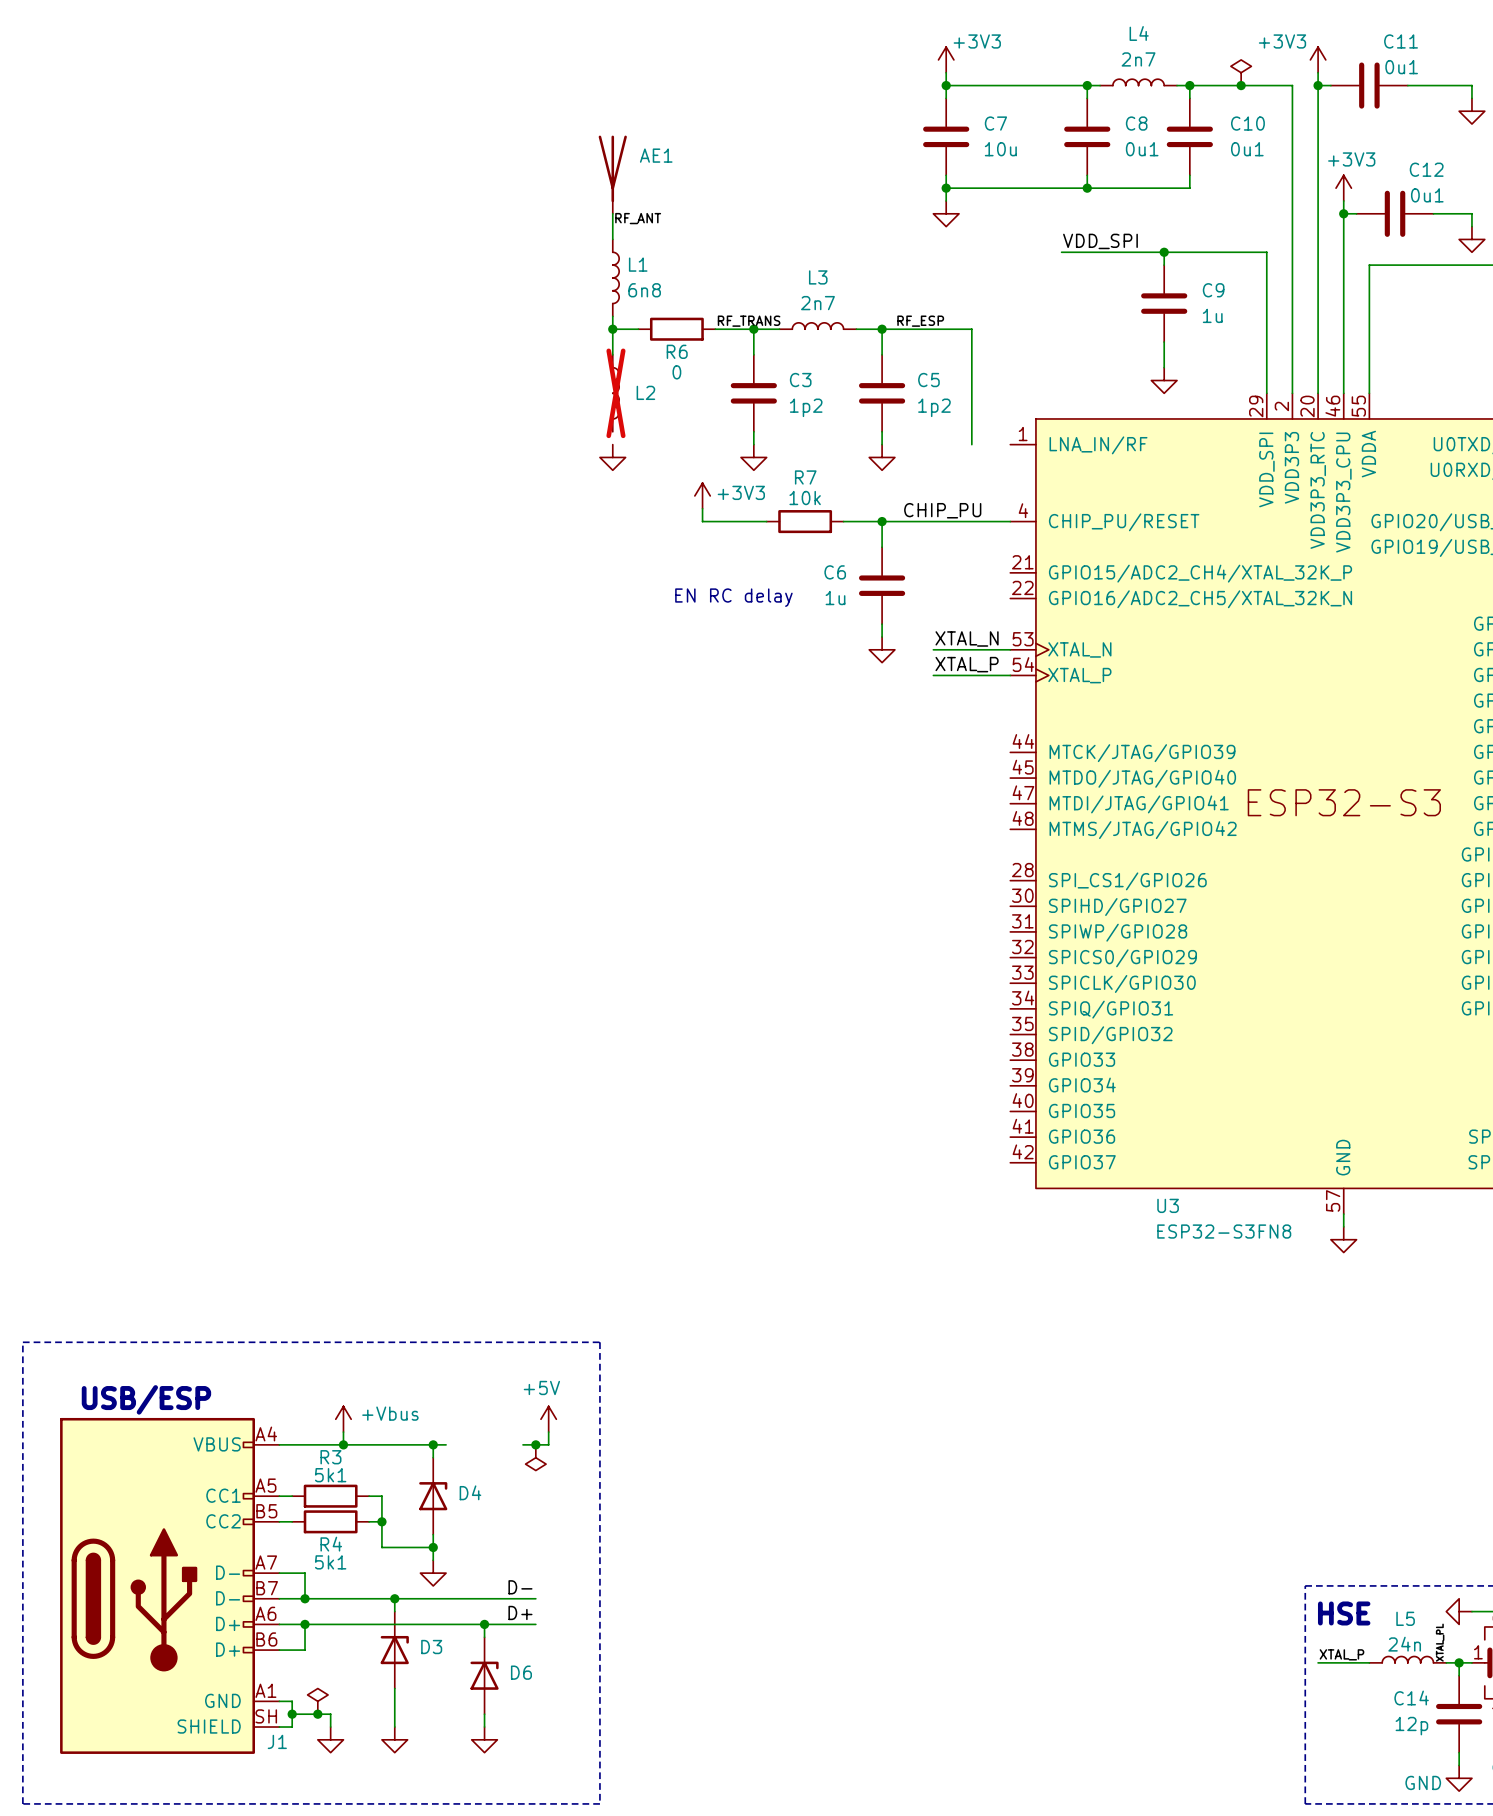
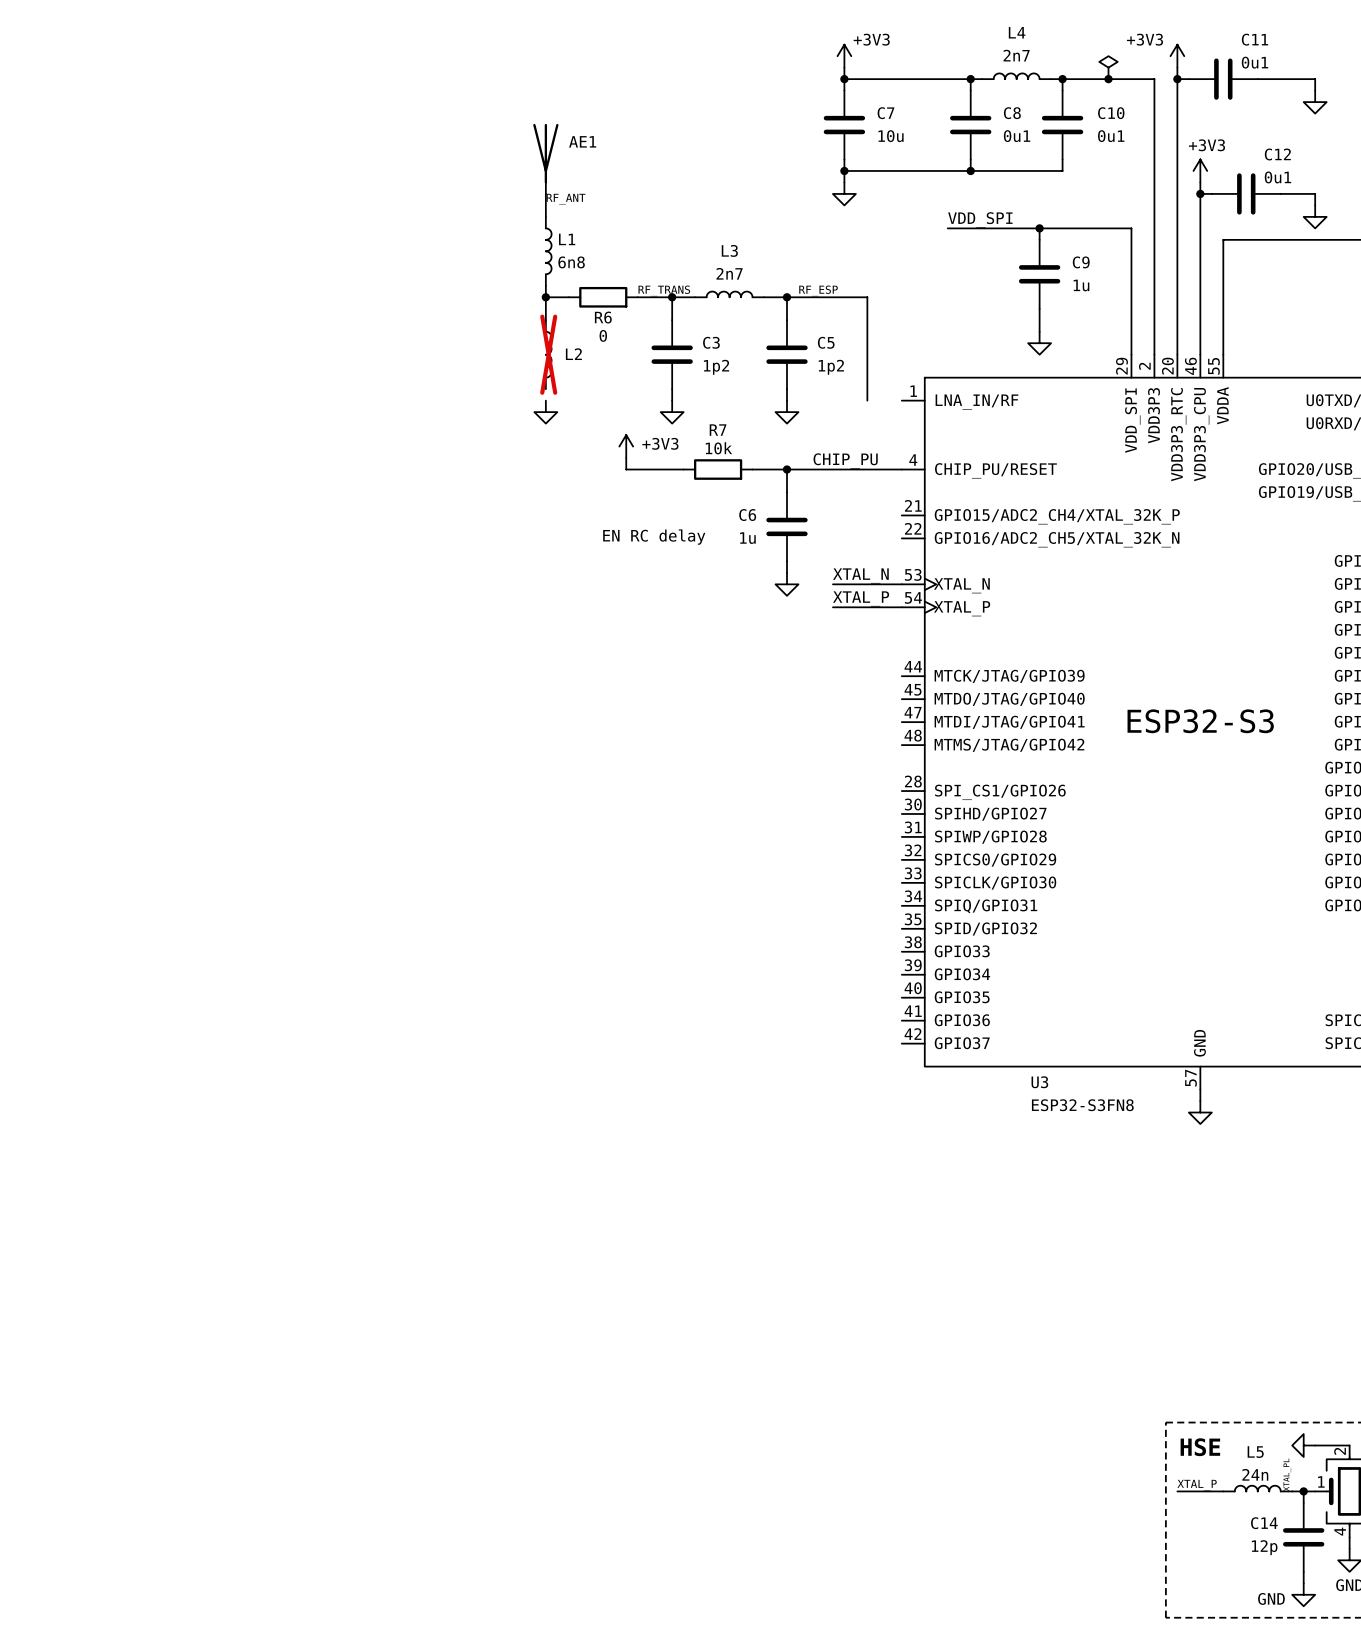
line: (22, 1342) (599, 1342) (599, 1803) (22, 1803) (22, 1342) -> none
text: USB/ESP (146, 1399) -> none
power symbol: +Vbus (343, 1419) -> none
power symbol: +5V (548, 1419) -> none
wire: (343, 1432) (343, 1444) -> none
wire: (548, 1432) (548, 1444) (523, 1444) -> none
wire: (279, 1444) (446, 1444) -> none
junction: (343, 1444) -> none
wire: (433, 1444) (433, 1457) -> none
junction: (433, 1444) -> none
junction: (535, 1444) -> none
power symbol: (535, 1457) -> none
wire: (279, 1496) (292, 1496) -> none
R3: 5k1 (330, 1496) -> none
wire: (369, 1496) (381, 1496) (381, 1547) (433, 1547) -> none
D4: (433, 1496) -> none
wire: (279, 1521) (292, 1521) -> none
R4: 5k1 (330, 1521) -> none
wire: (369, 1521) (381, 1521) -> none
junction: (381, 1521) -> none
wire: (433, 1534) (433, 1560) -> none
junction: (433, 1547) -> none
wire: (279, 1573) (305, 1573) (305, 1598) -> none
power symbol: (433, 1573) -> none
J1: (169, 1585) -> none
label: D- (520, 1587) -> none
wire: (279, 1598) (535, 1598) -> none
junction: (305, 1598) -> none
wire: (394, 1598) (394, 1611) -> none
junction: (394, 1598) -> none
label: D+ (520, 1612) -> none
wire: (279, 1624) (535, 1624) -> none
wire: (305, 1624) (305, 1650) (279, 1650) -> none
junction: (305, 1624) -> none
wire: (484, 1624) (484, 1637) -> none
junction: (484, 1624) -> none
D3: (394, 1650) -> none
D6: (484, 1675) -> none
wire: (394, 1688) (394, 1727) -> none
wire: (279, 1701) (292, 1701) (292, 1727) (279, 1727) -> none
power symbol: (317, 1701) -> none
wire: (292, 1714) (330, 1714) (330, 1727) -> none
junction: (292, 1714) -> none
junction: (317, 1714) -> none
wire: (484, 1714) (484, 1727) -> none
power symbol: (330, 1739) -> none
power symbol: (394, 1739) -> none
power symbol: (484, 1739) -> none

